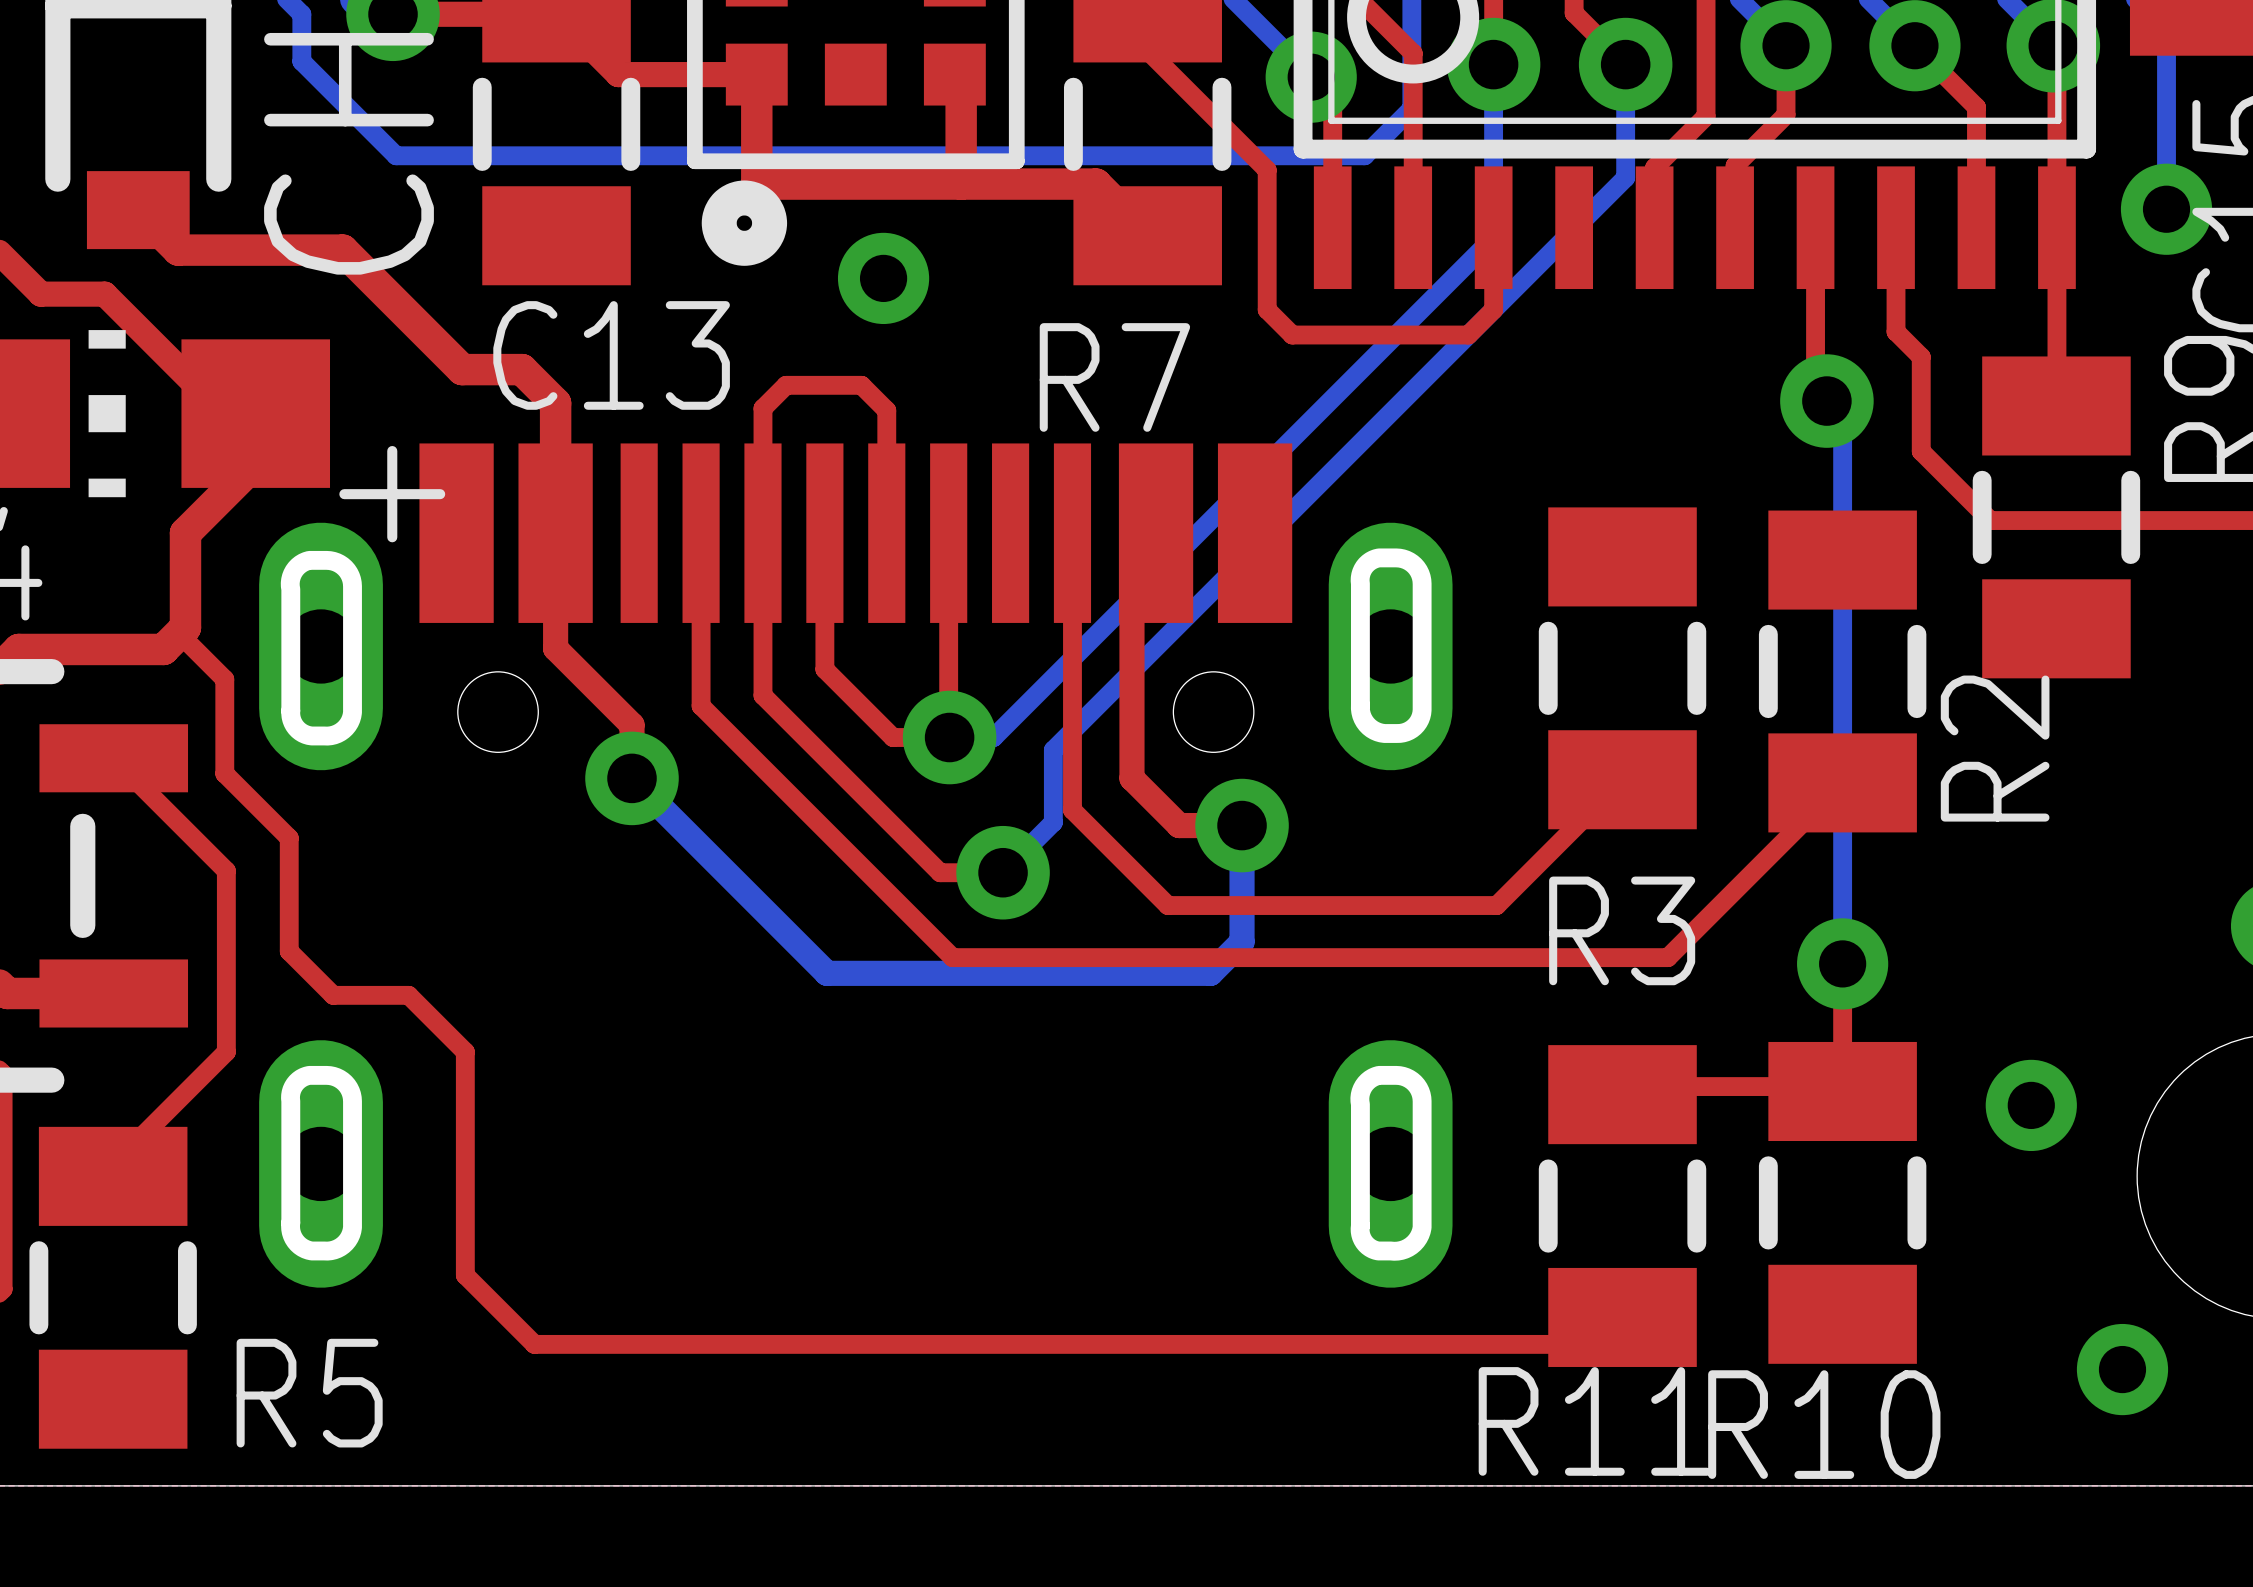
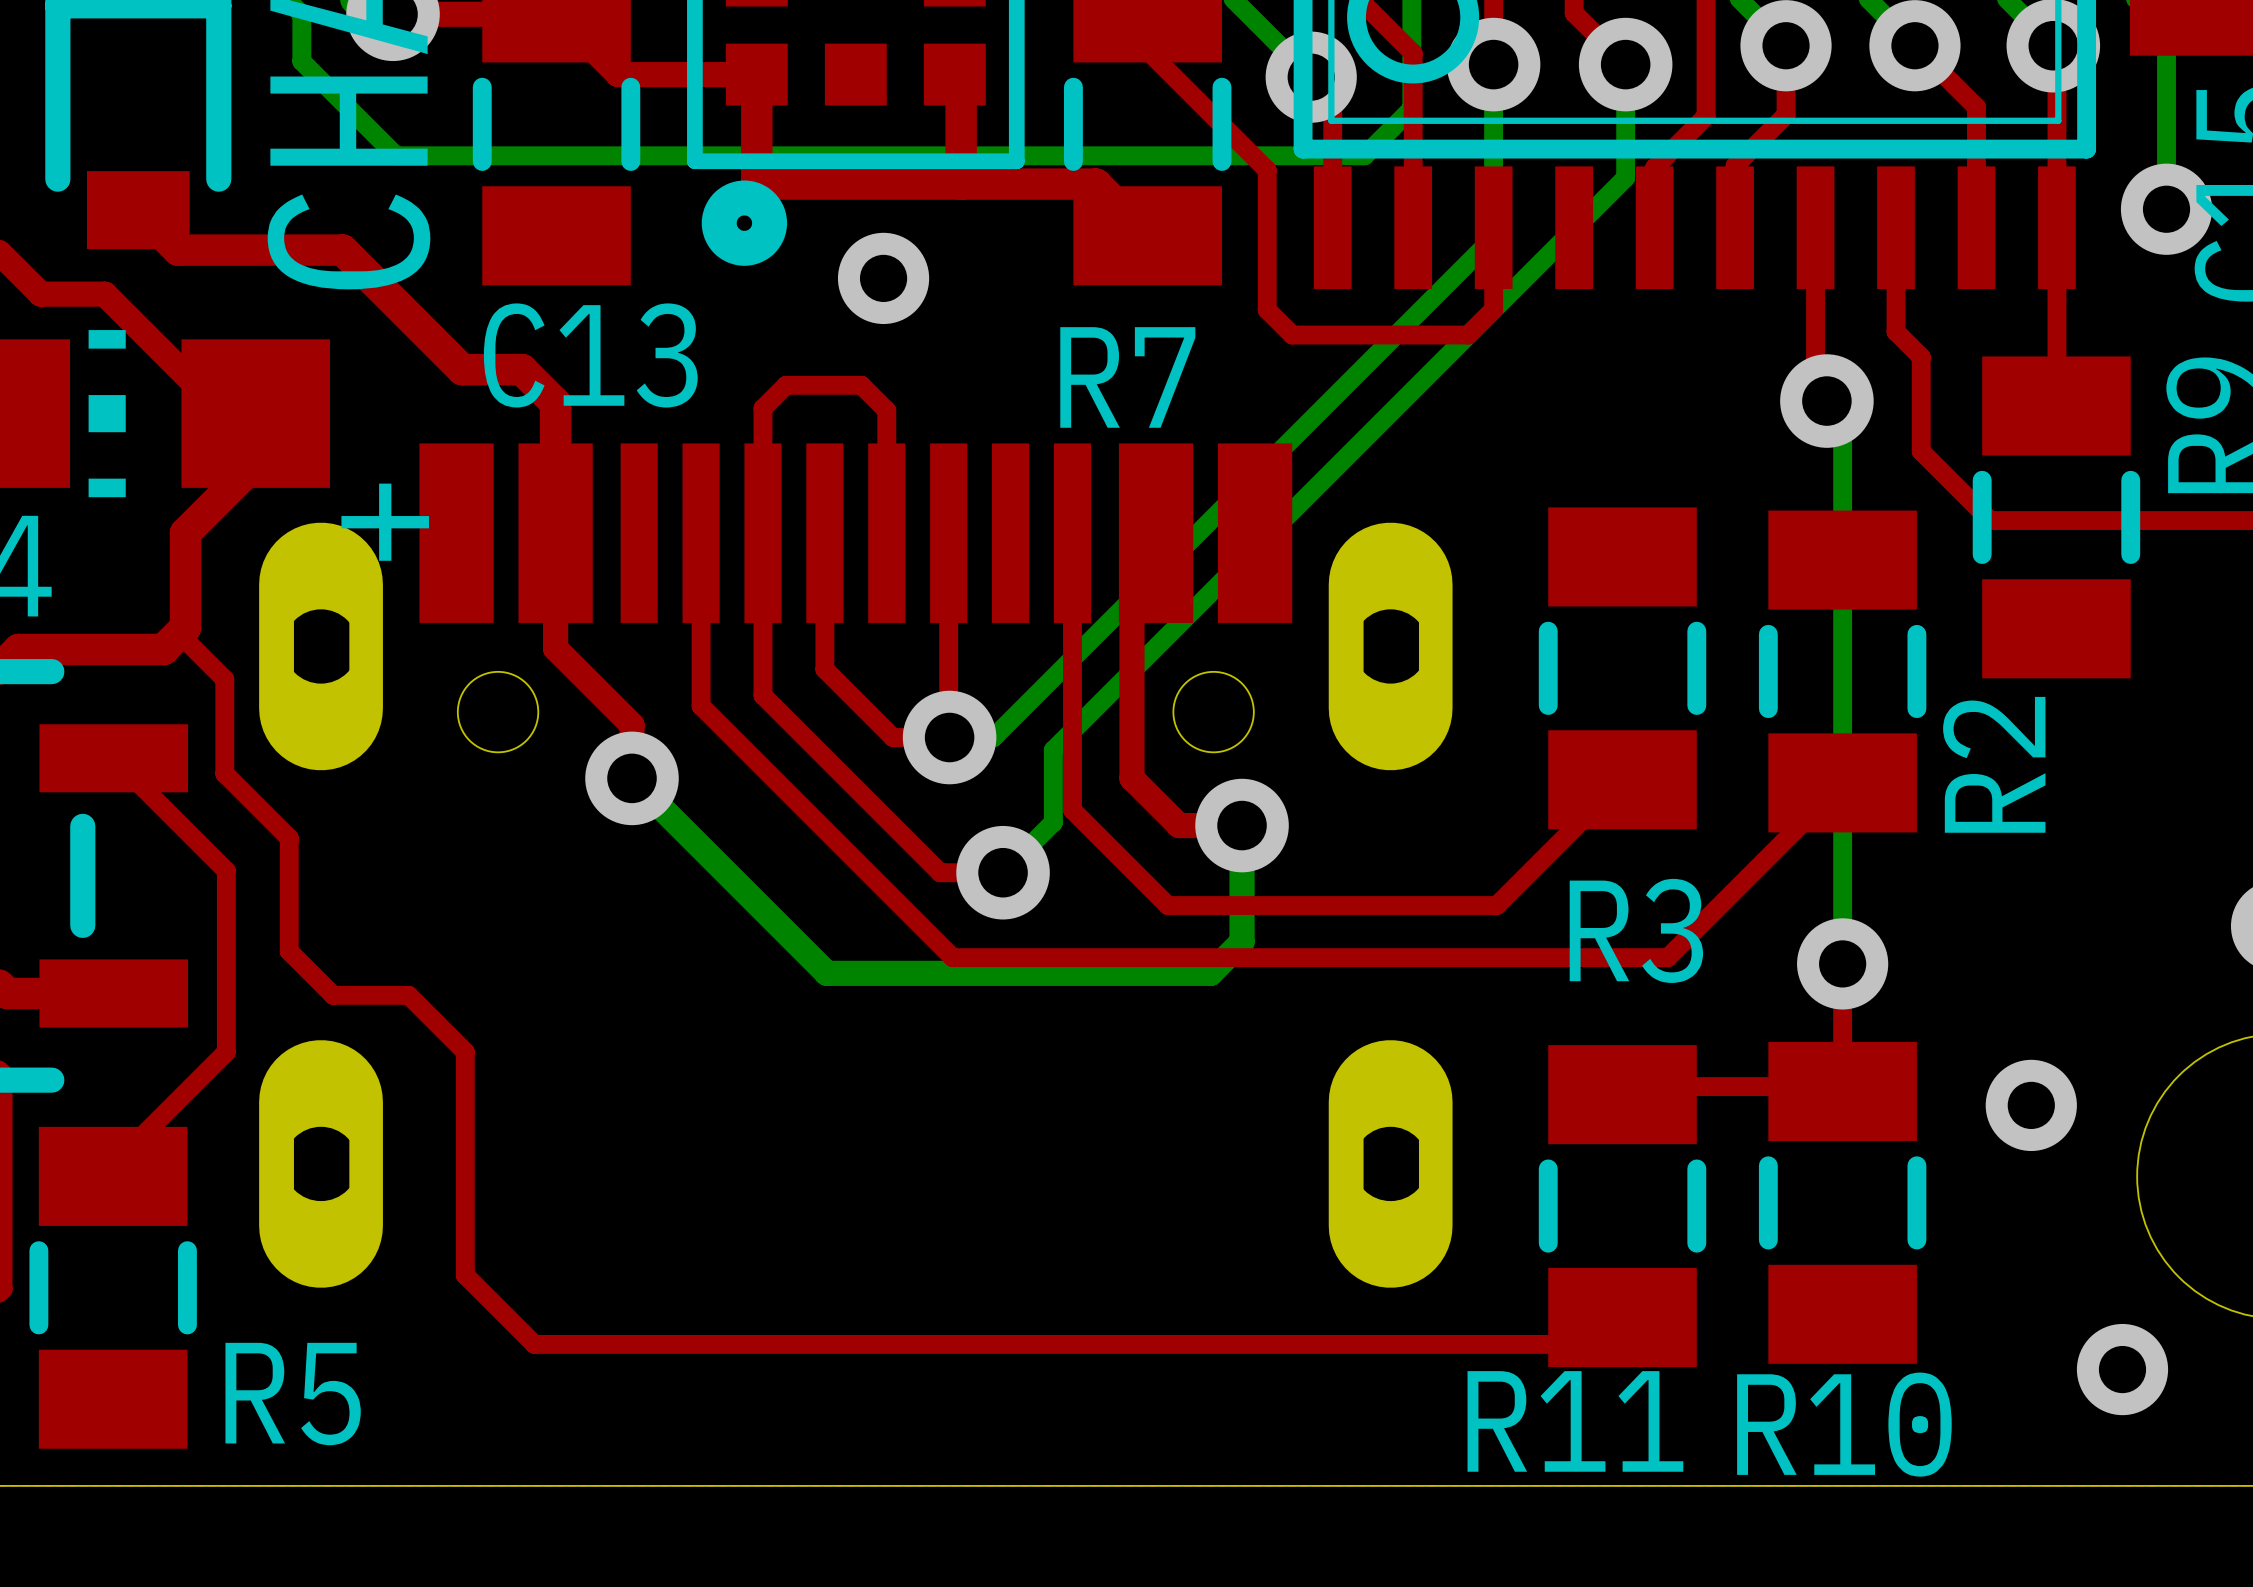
part footprint: [259, 443, 1453, 1288] -> [259, 443, 1453, 1288]

